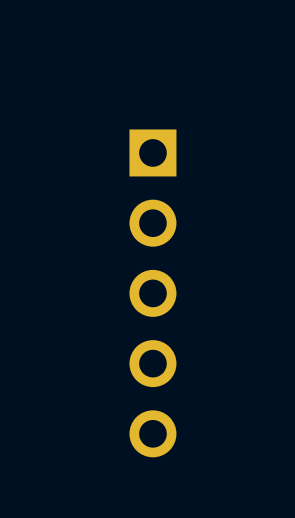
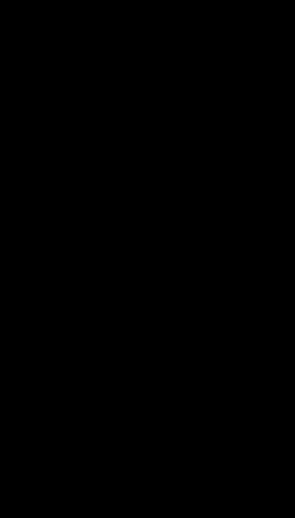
part: (152, 293) -> none

